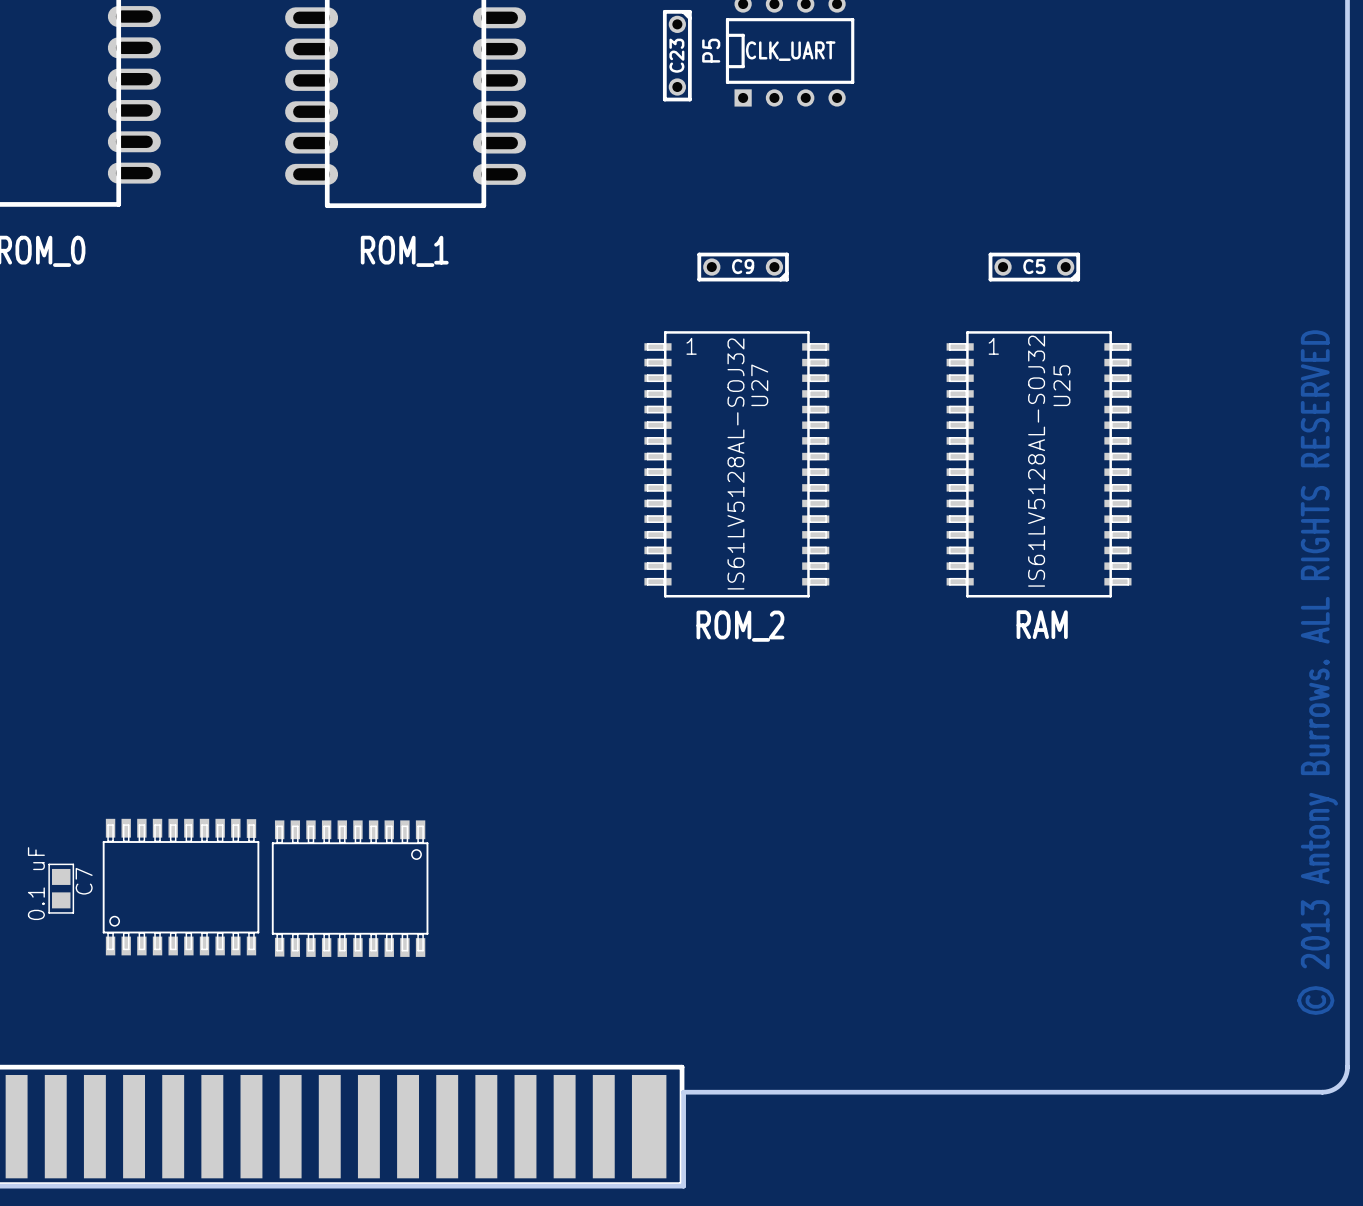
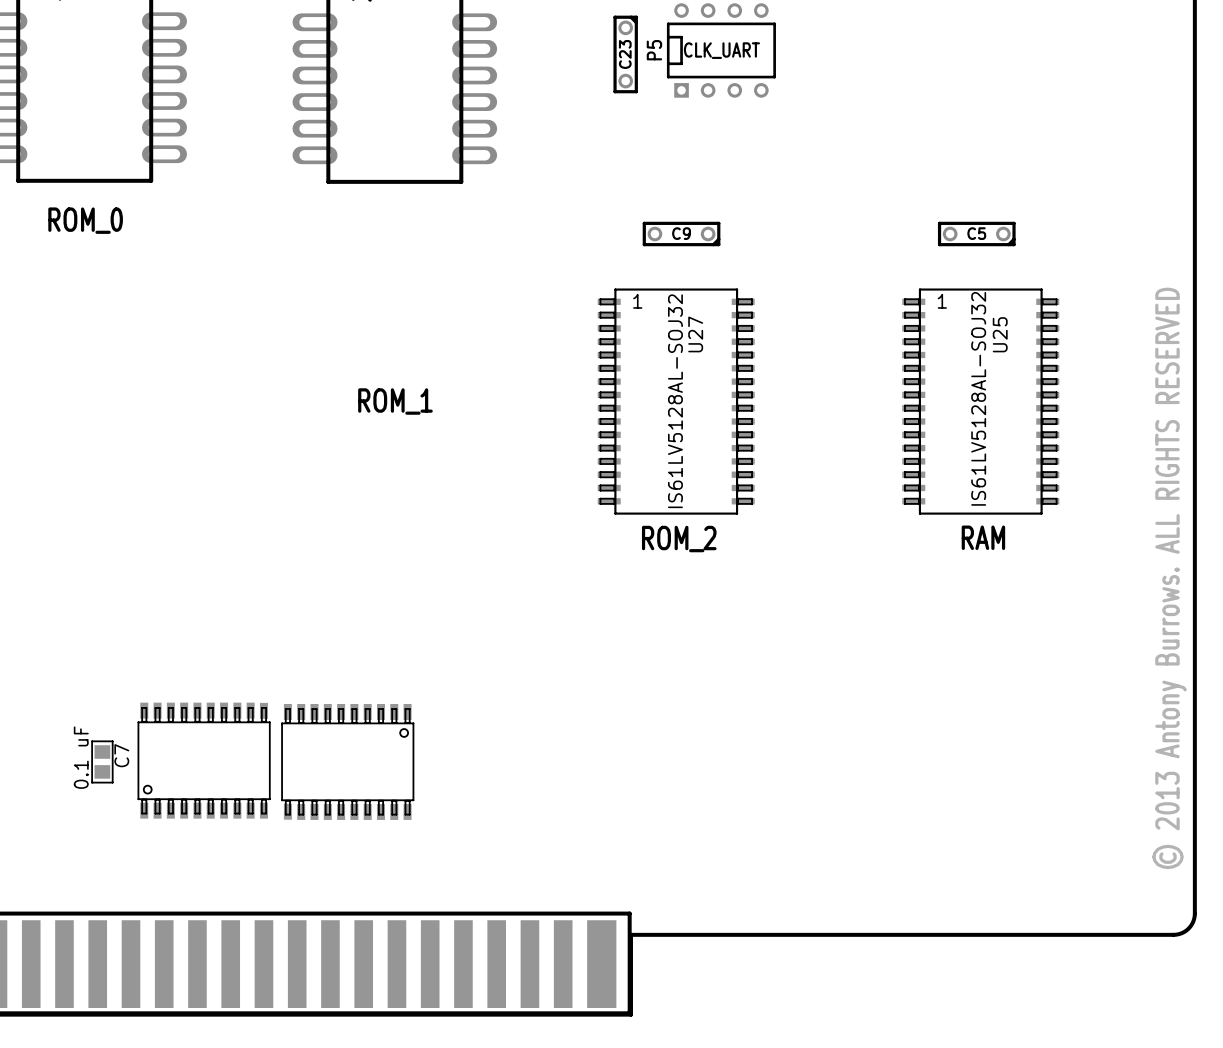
text position: ROM_1 (404, 251) -> ROM_1 (395, 401)
C5 position: (1034, 267) -> (976, 234)
U25 position: (1039, 464) -> (980, 401)
text position: RAM (1042, 624) -> RAM (983, 537)

